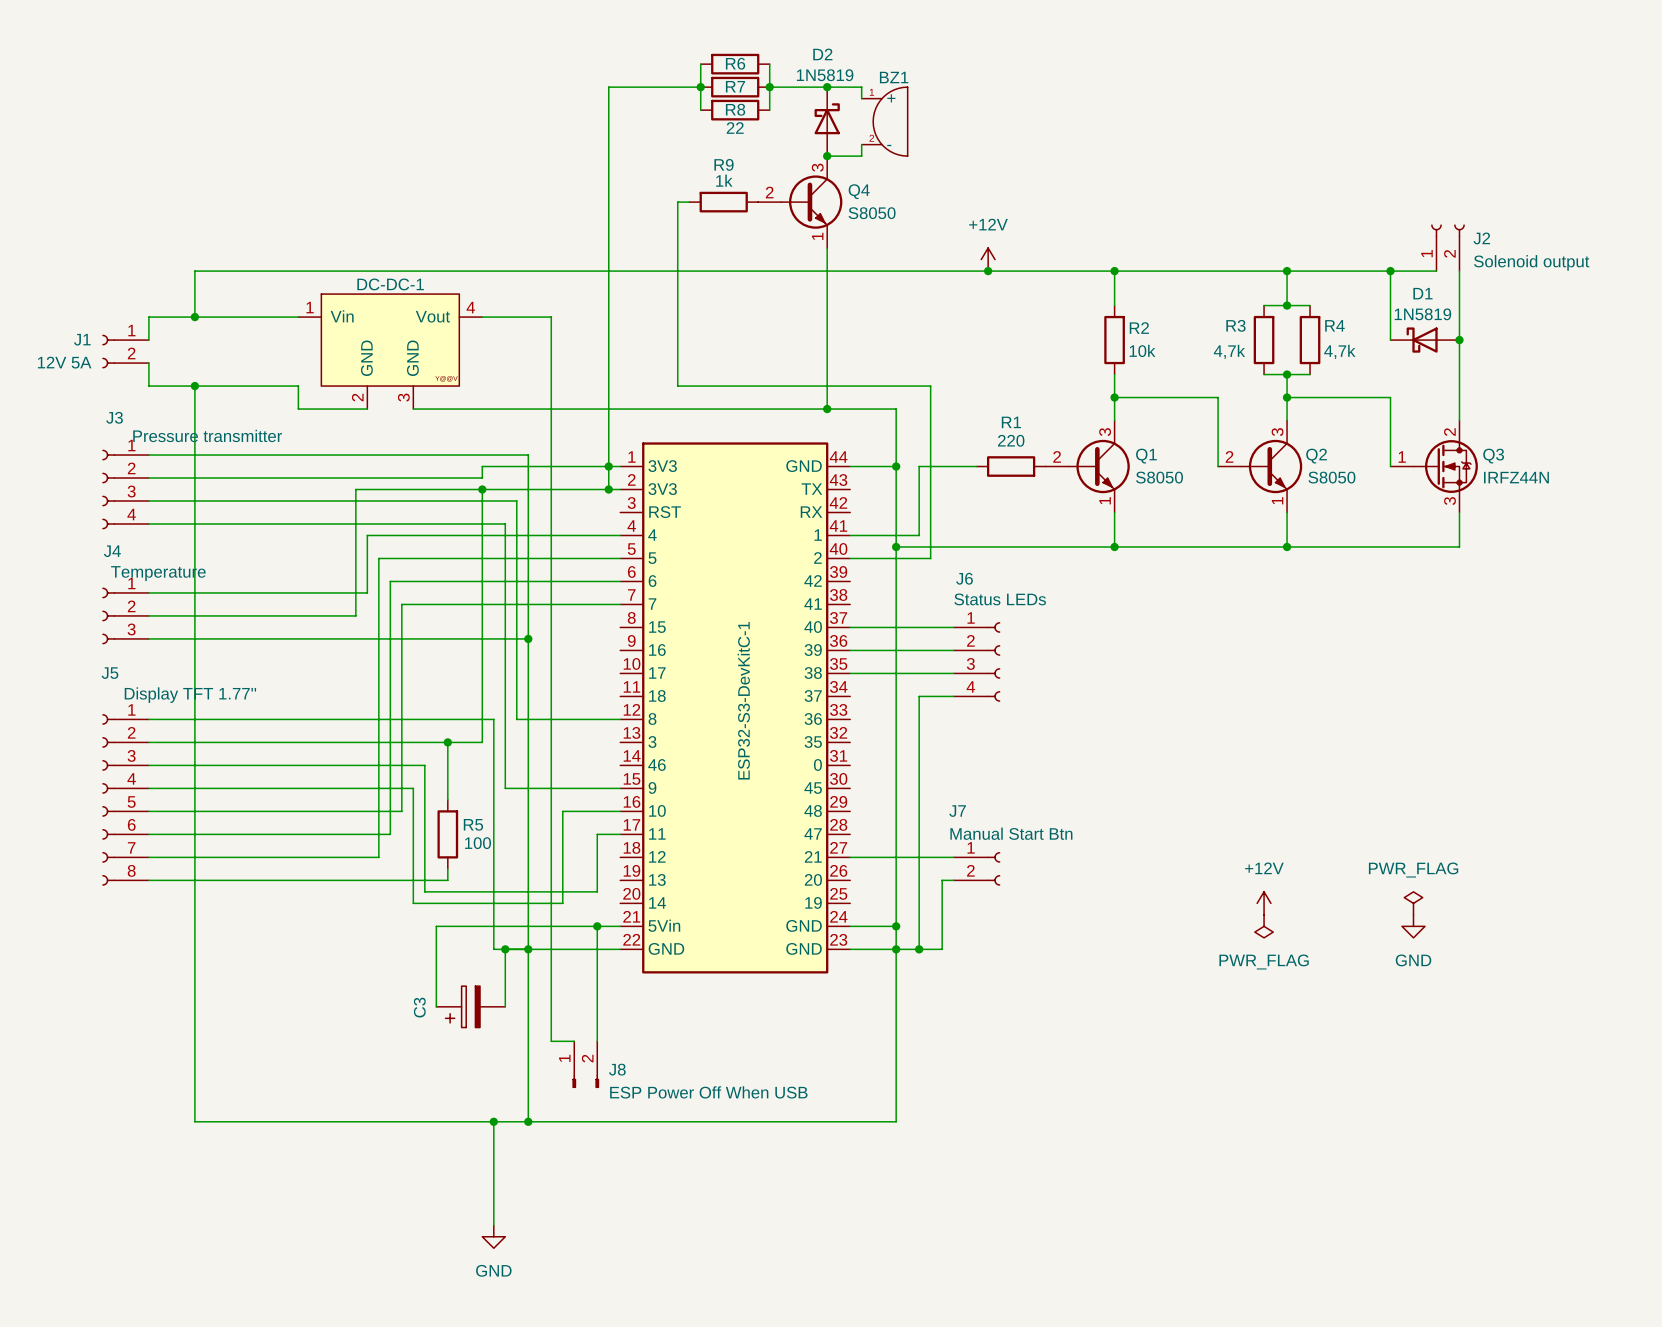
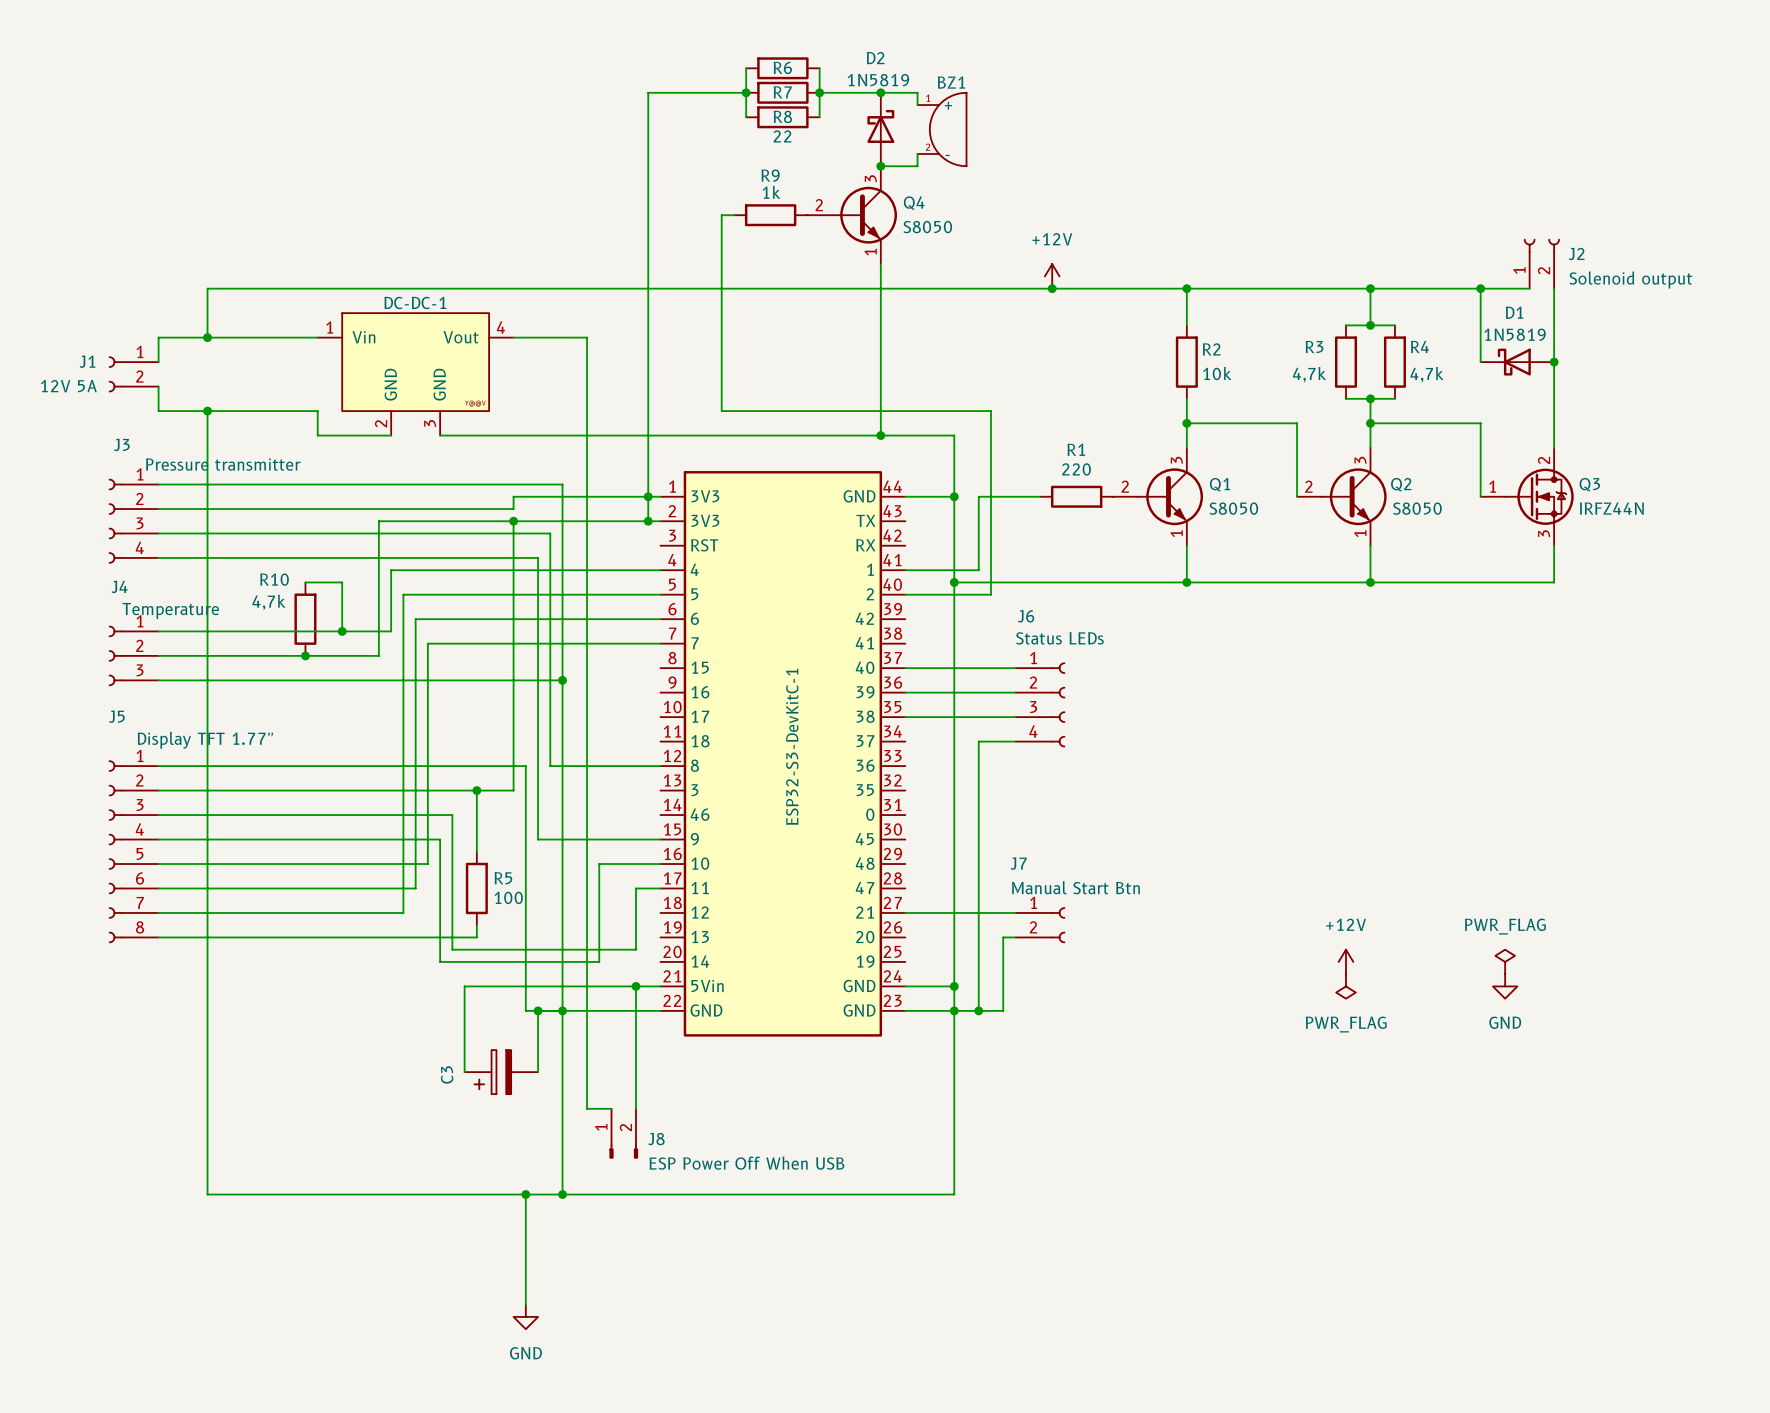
wire: none -> (305, 582) (342, 582) (342, 631)
R10: none -> 4,7k (305, 619)
junction: none -> (342, 631)
junction: none -> (305, 655)

